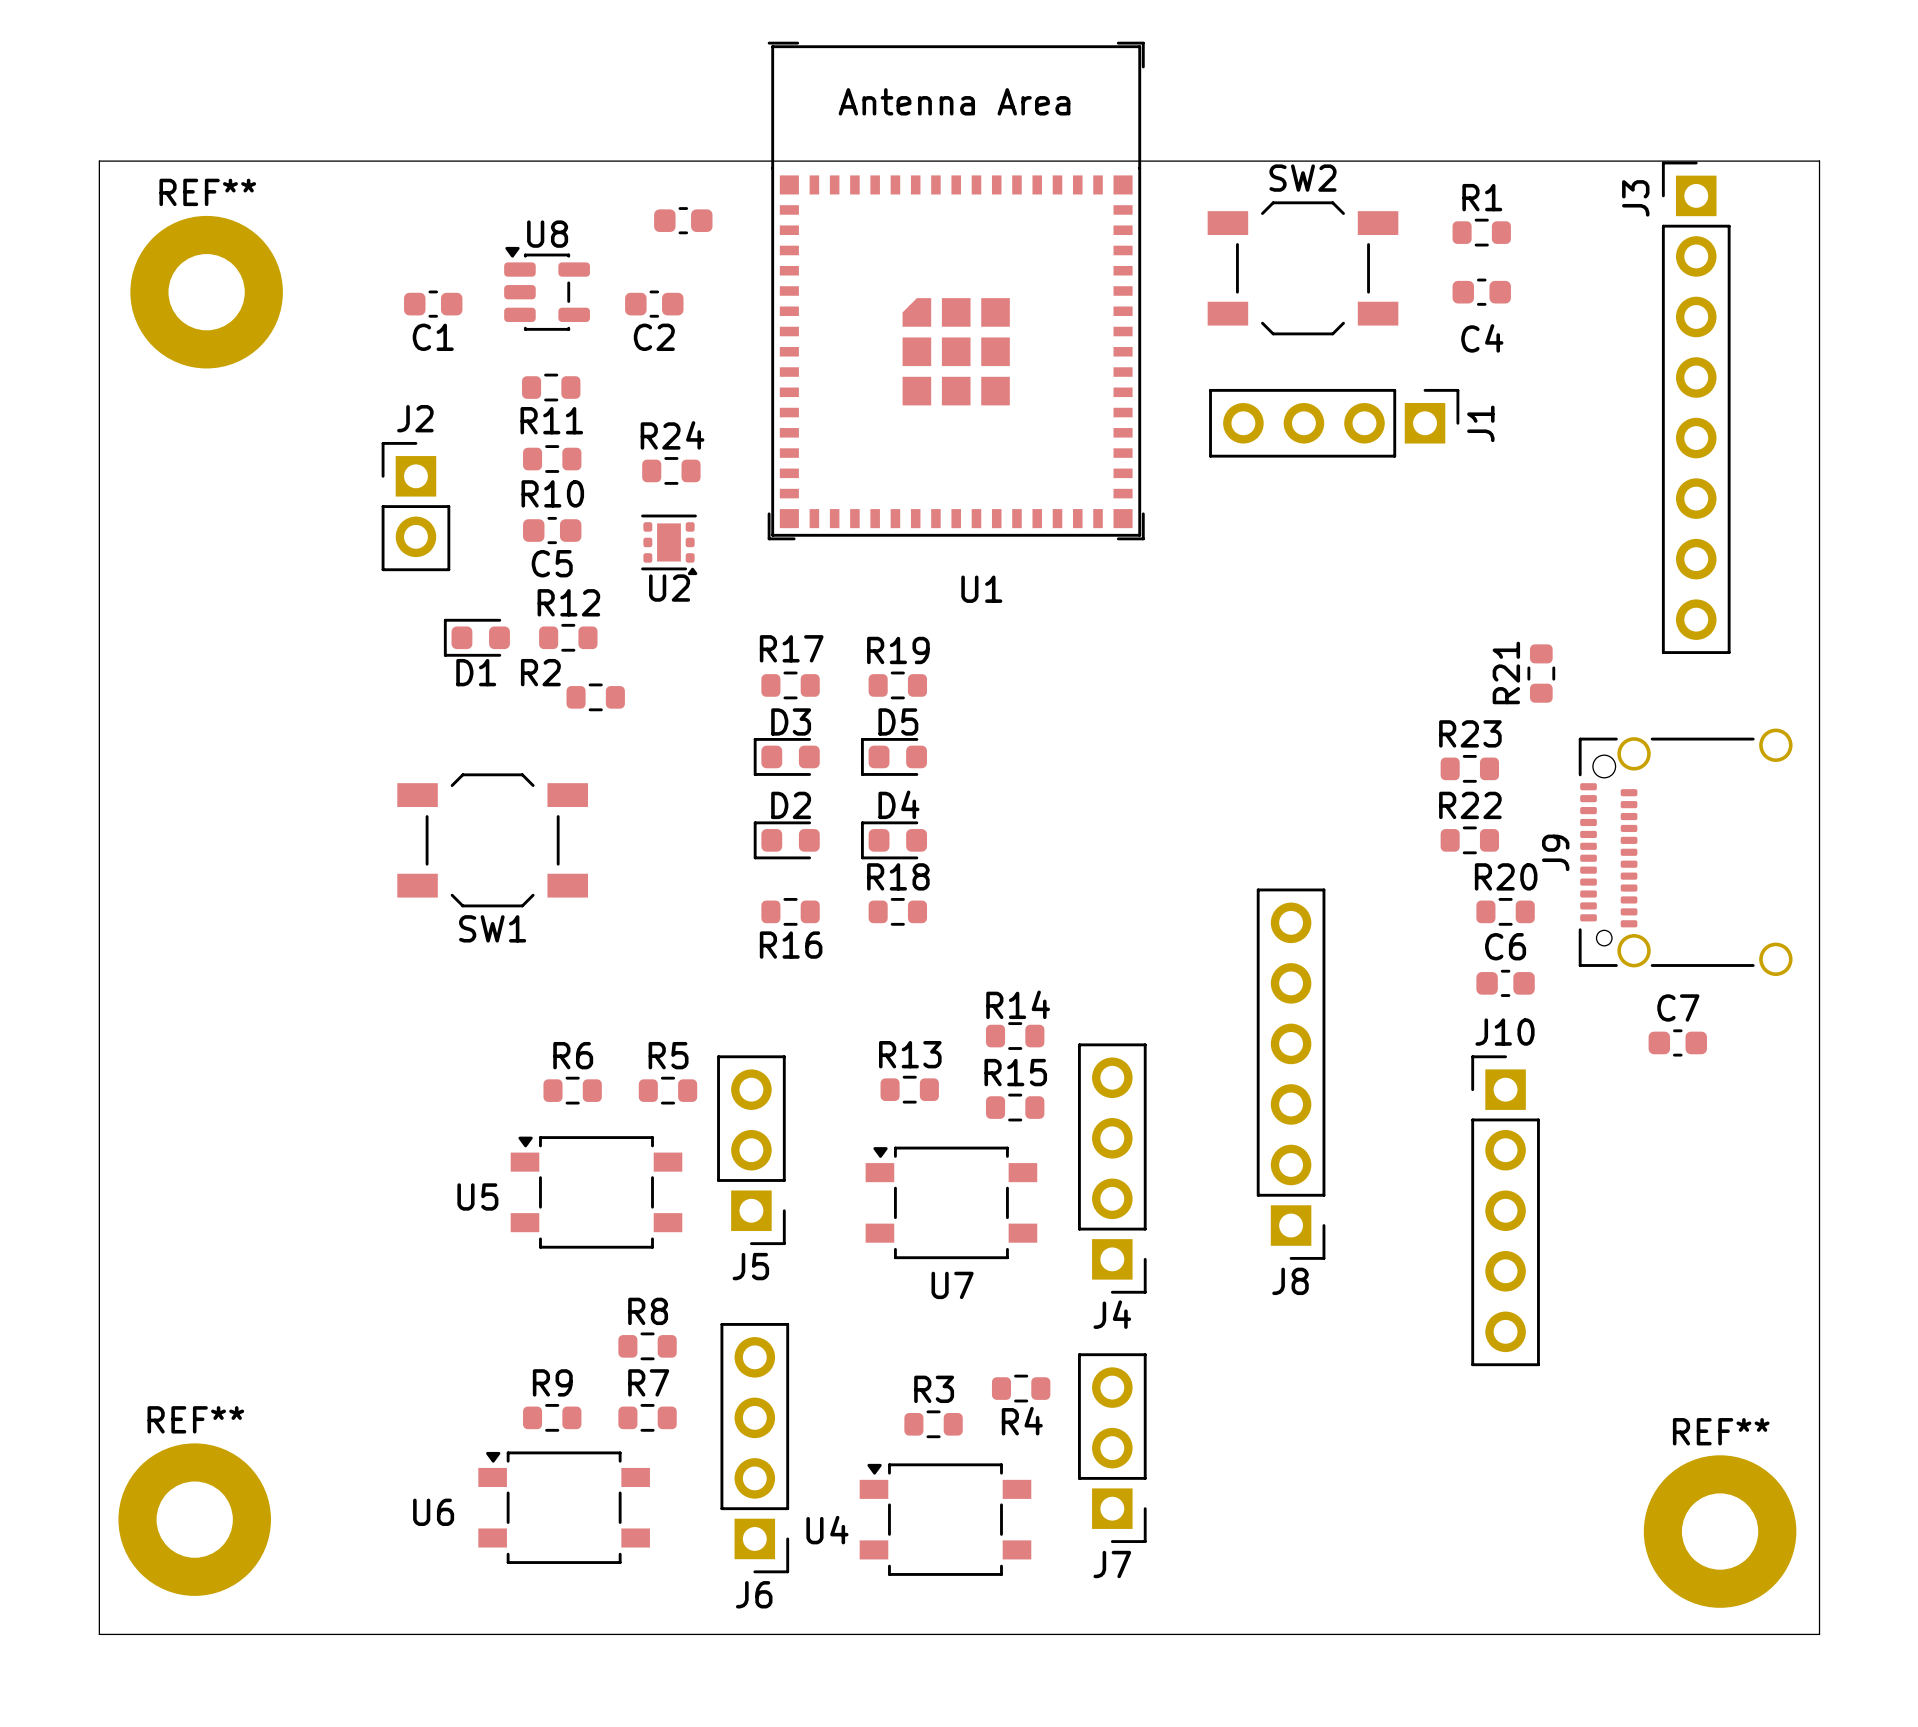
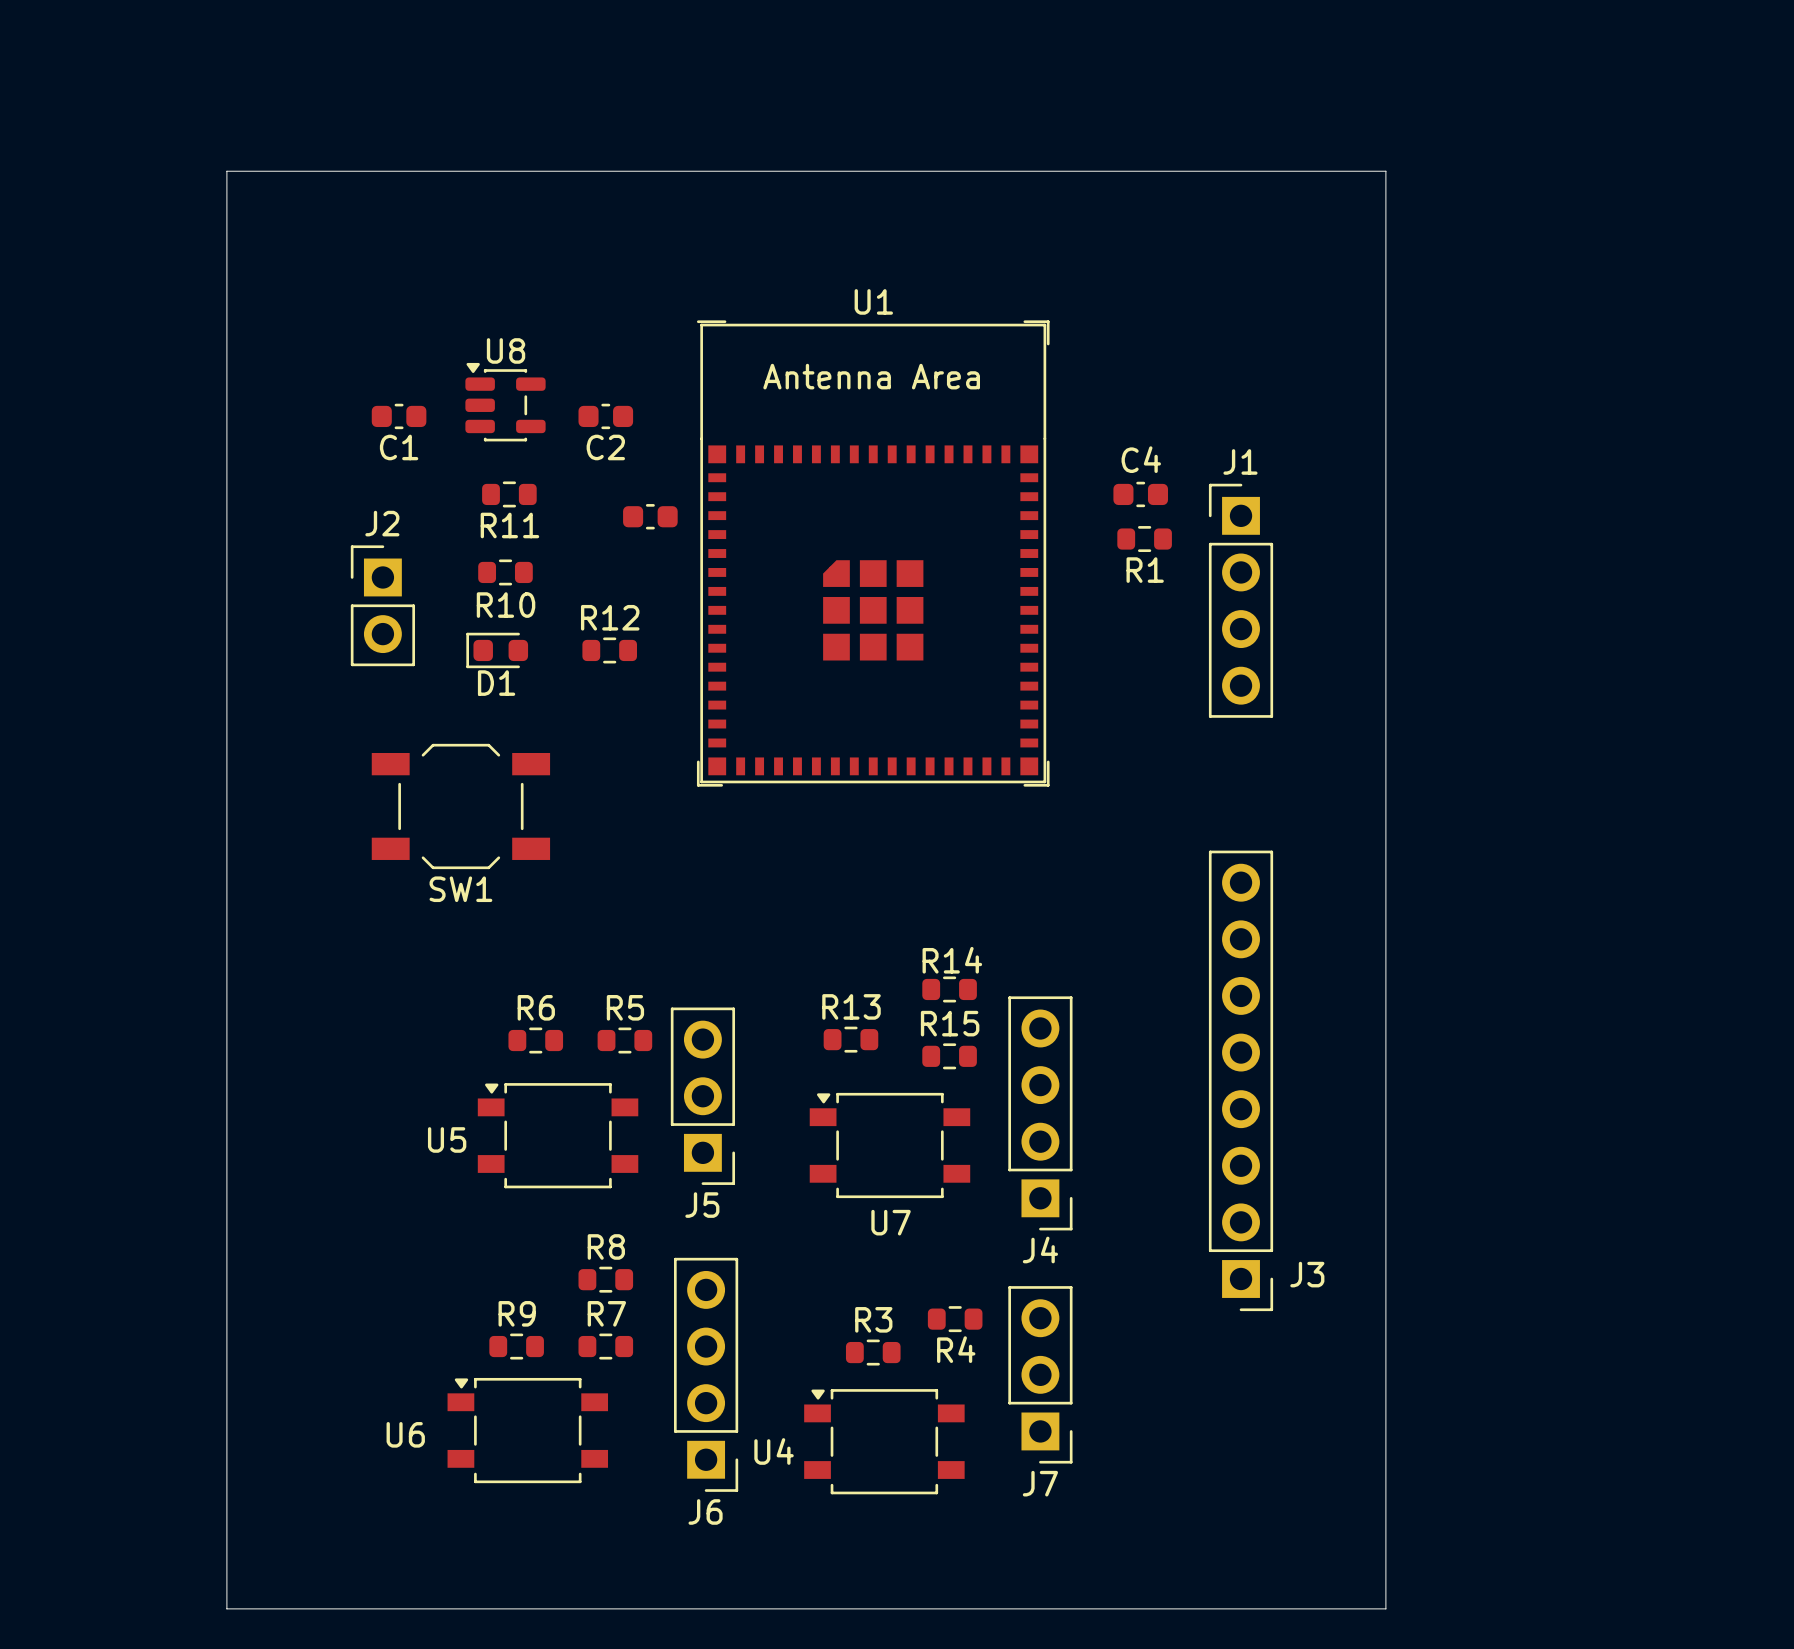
board edge: (242, 161) (99, 161) (99, 1634) (1819, 1634) (1819, 161) (1481, 161) -> (226, 171) (226, 1608) (1385, 1608) (1385, 171)
R1 name position: R1 (1482, 197) -> R1 (1145, 570)
part position: (683, 220) -> (650, 516)
R1 position: (1481, 232) -> (1144, 539)
SW2: (1302, 268) -> none
U8 position: (547, 288) -> (505, 402)
U1 position: (956, 290) -> (873, 553)
REF**: (206, 292) -> none
C4 position: (1481, 292) -> (1140, 494)
C1 position: (433, 304) -> (399, 416)
C2 position: (654, 304) -> (605, 416)
C4 name position: C4 (1482, 338) -> C4 (1141, 459)
R11 position: (551, 387) -> (509, 494)
J3 rotation: 0° (1696, 407) -> 180° (1241, 1080)
J3 position: (1696, 407) -> (1241, 1080)
J1 rotation: 0° (1334, 423) -> 90° counterclockwise (1241, 600)
J1 position: (1334, 423) -> (1241, 600)
R10 position: (552, 459) -> (505, 572)
R24: (671, 470) -> none
J2 position: (415, 506) -> (382, 605)
C5: (552, 530) -> none
U2: (669, 544) -> none
U1 name position: U1 (981, 589) -> U1 (873, 301)
D1 position: (476, 637) -> (497, 650)
R12 position: (568, 637) -> (609, 650)
R21: (1541, 673) -> none
R17: (790, 685) -> none
R19: (897, 685) -> none
R2: (595, 697) -> none
D3: (786, 756) -> none
D5: (893, 756) -> none
R23: (1469, 768) -> none
D2: (786, 840) -> none
D4: (893, 840) -> none
R22: (1469, 840) -> none
J9: (1685, 852) -> none
R16: (790, 911) -> none
R18: (897, 911) -> none
R20: (1505, 911) -> none
C6: (1505, 983) -> none
C7: (1677, 1042) -> none
J8: (1291, 1074) -> none
J10: (1505, 1210) -> none
REF**: (194, 1519) -> none
REF**: (1720, 1531) -> none

